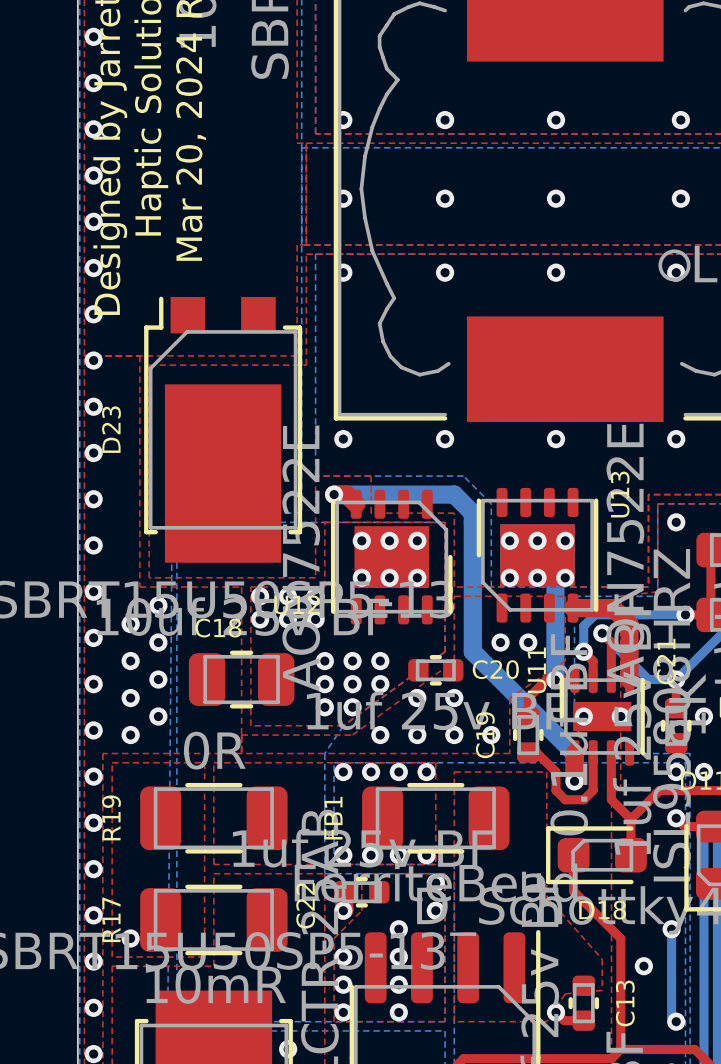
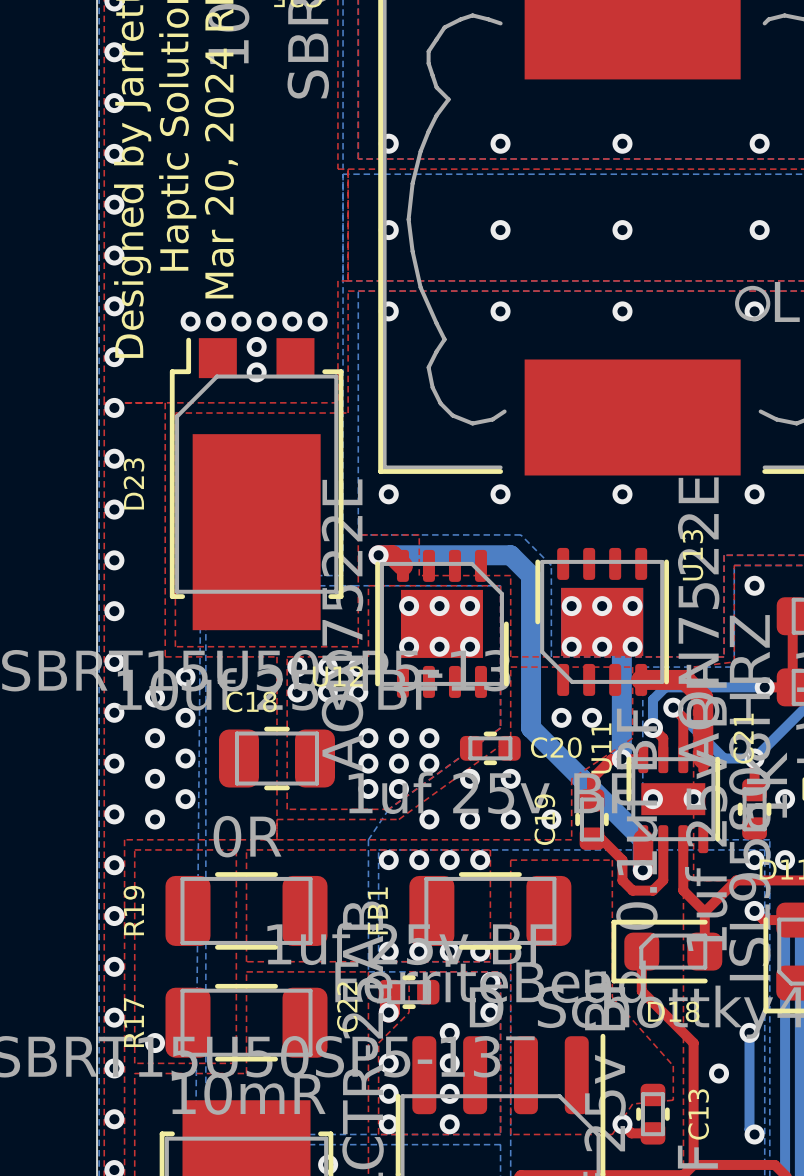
via: none -> (190, 321)
via: none -> (216, 321)
via: none -> (241, 321)
via: none -> (266, 321)
via: none -> (292, 321)
via: none -> (317, 321)
via: none -> (256, 346)
via: none -> (256, 372)

